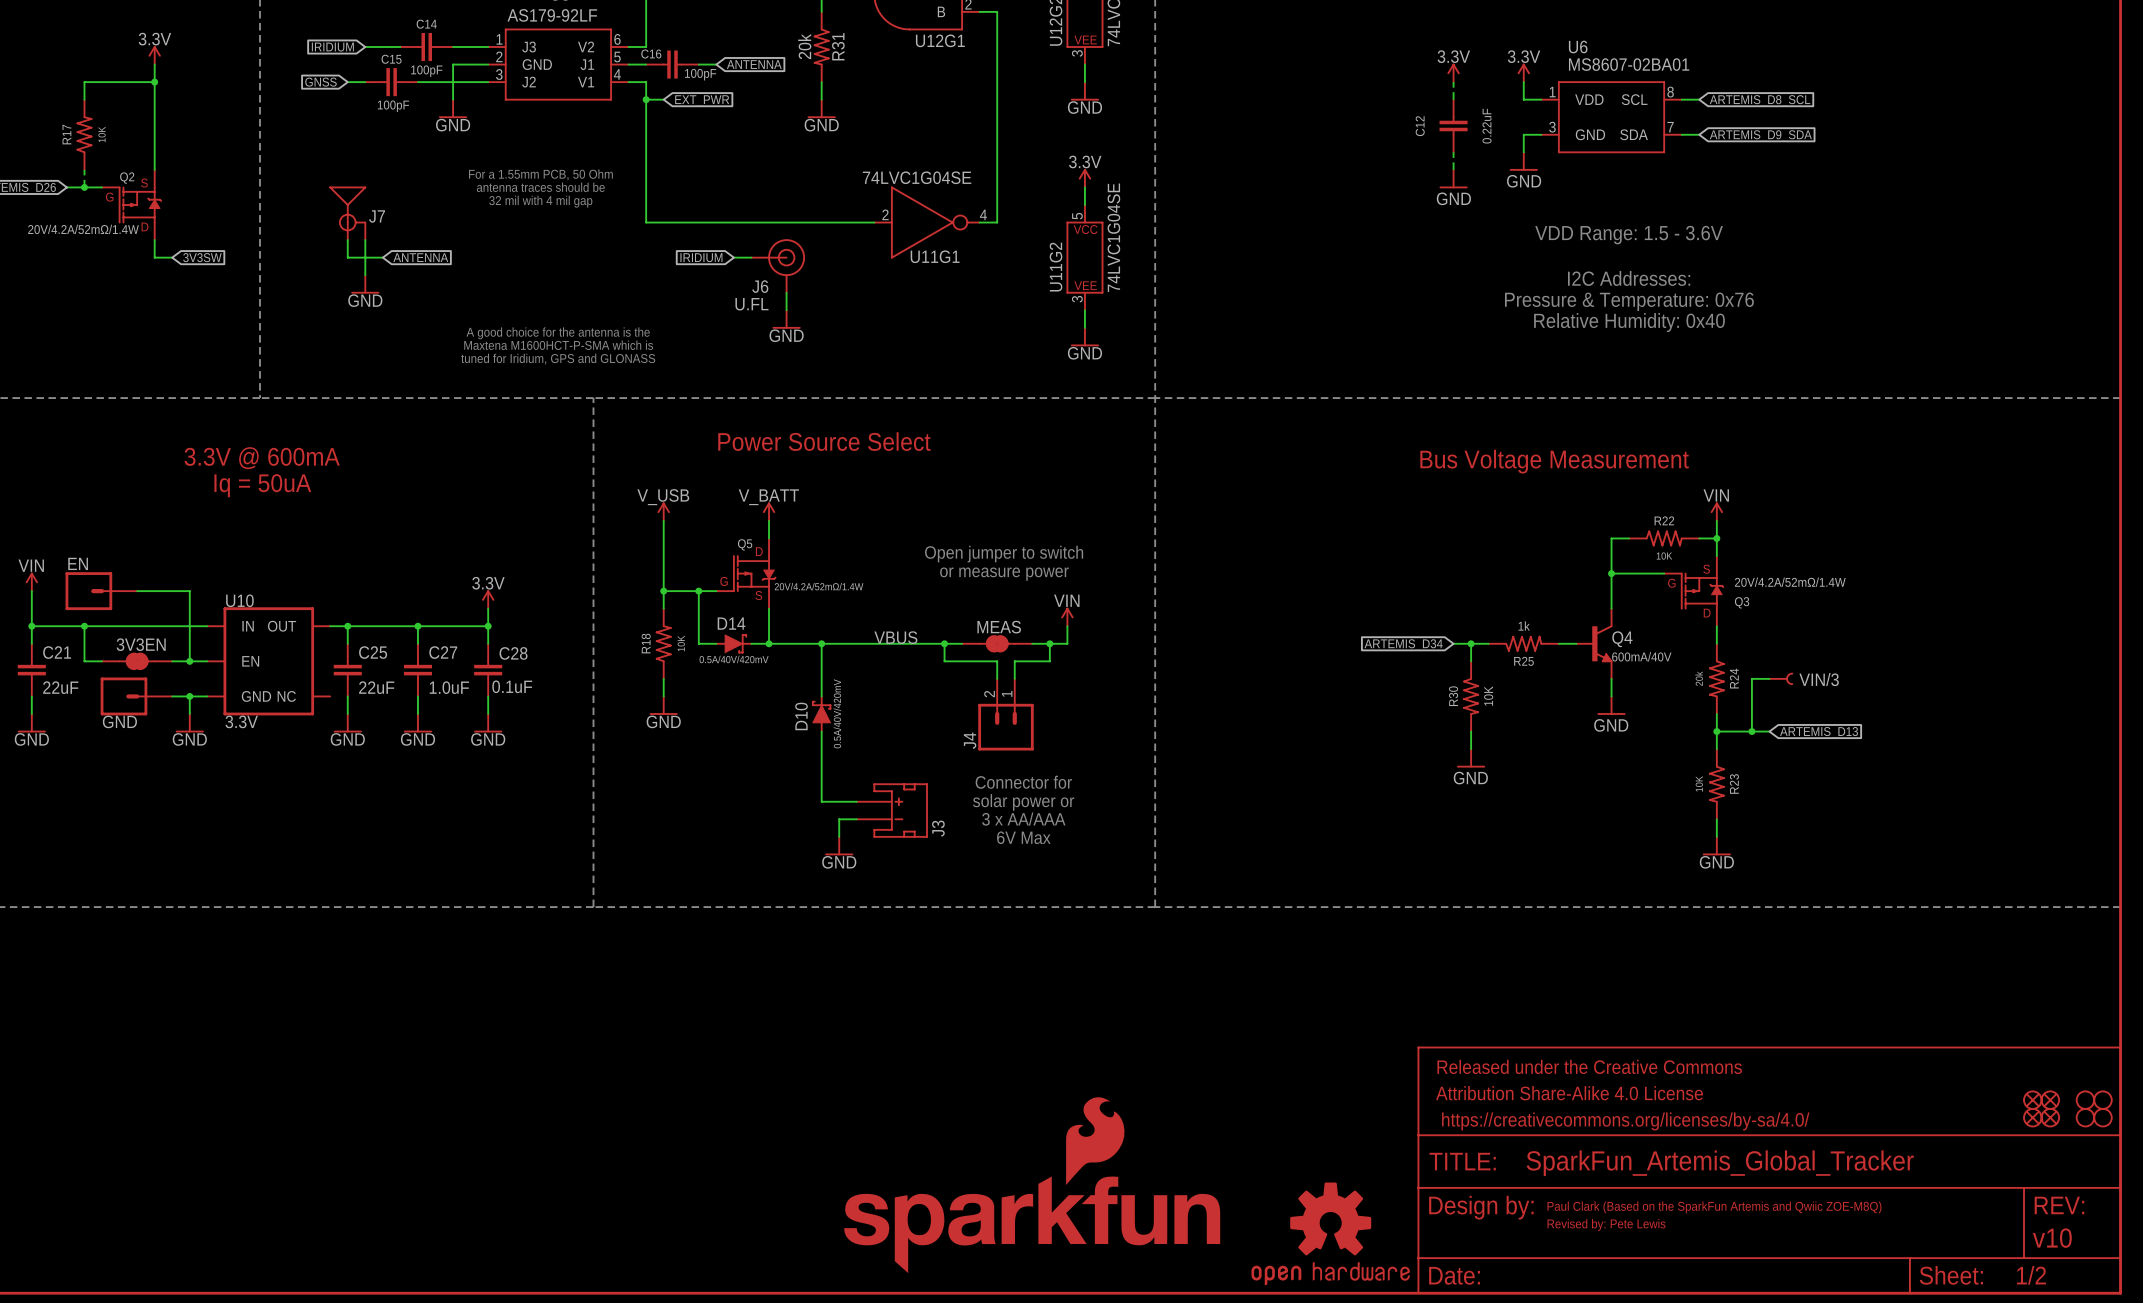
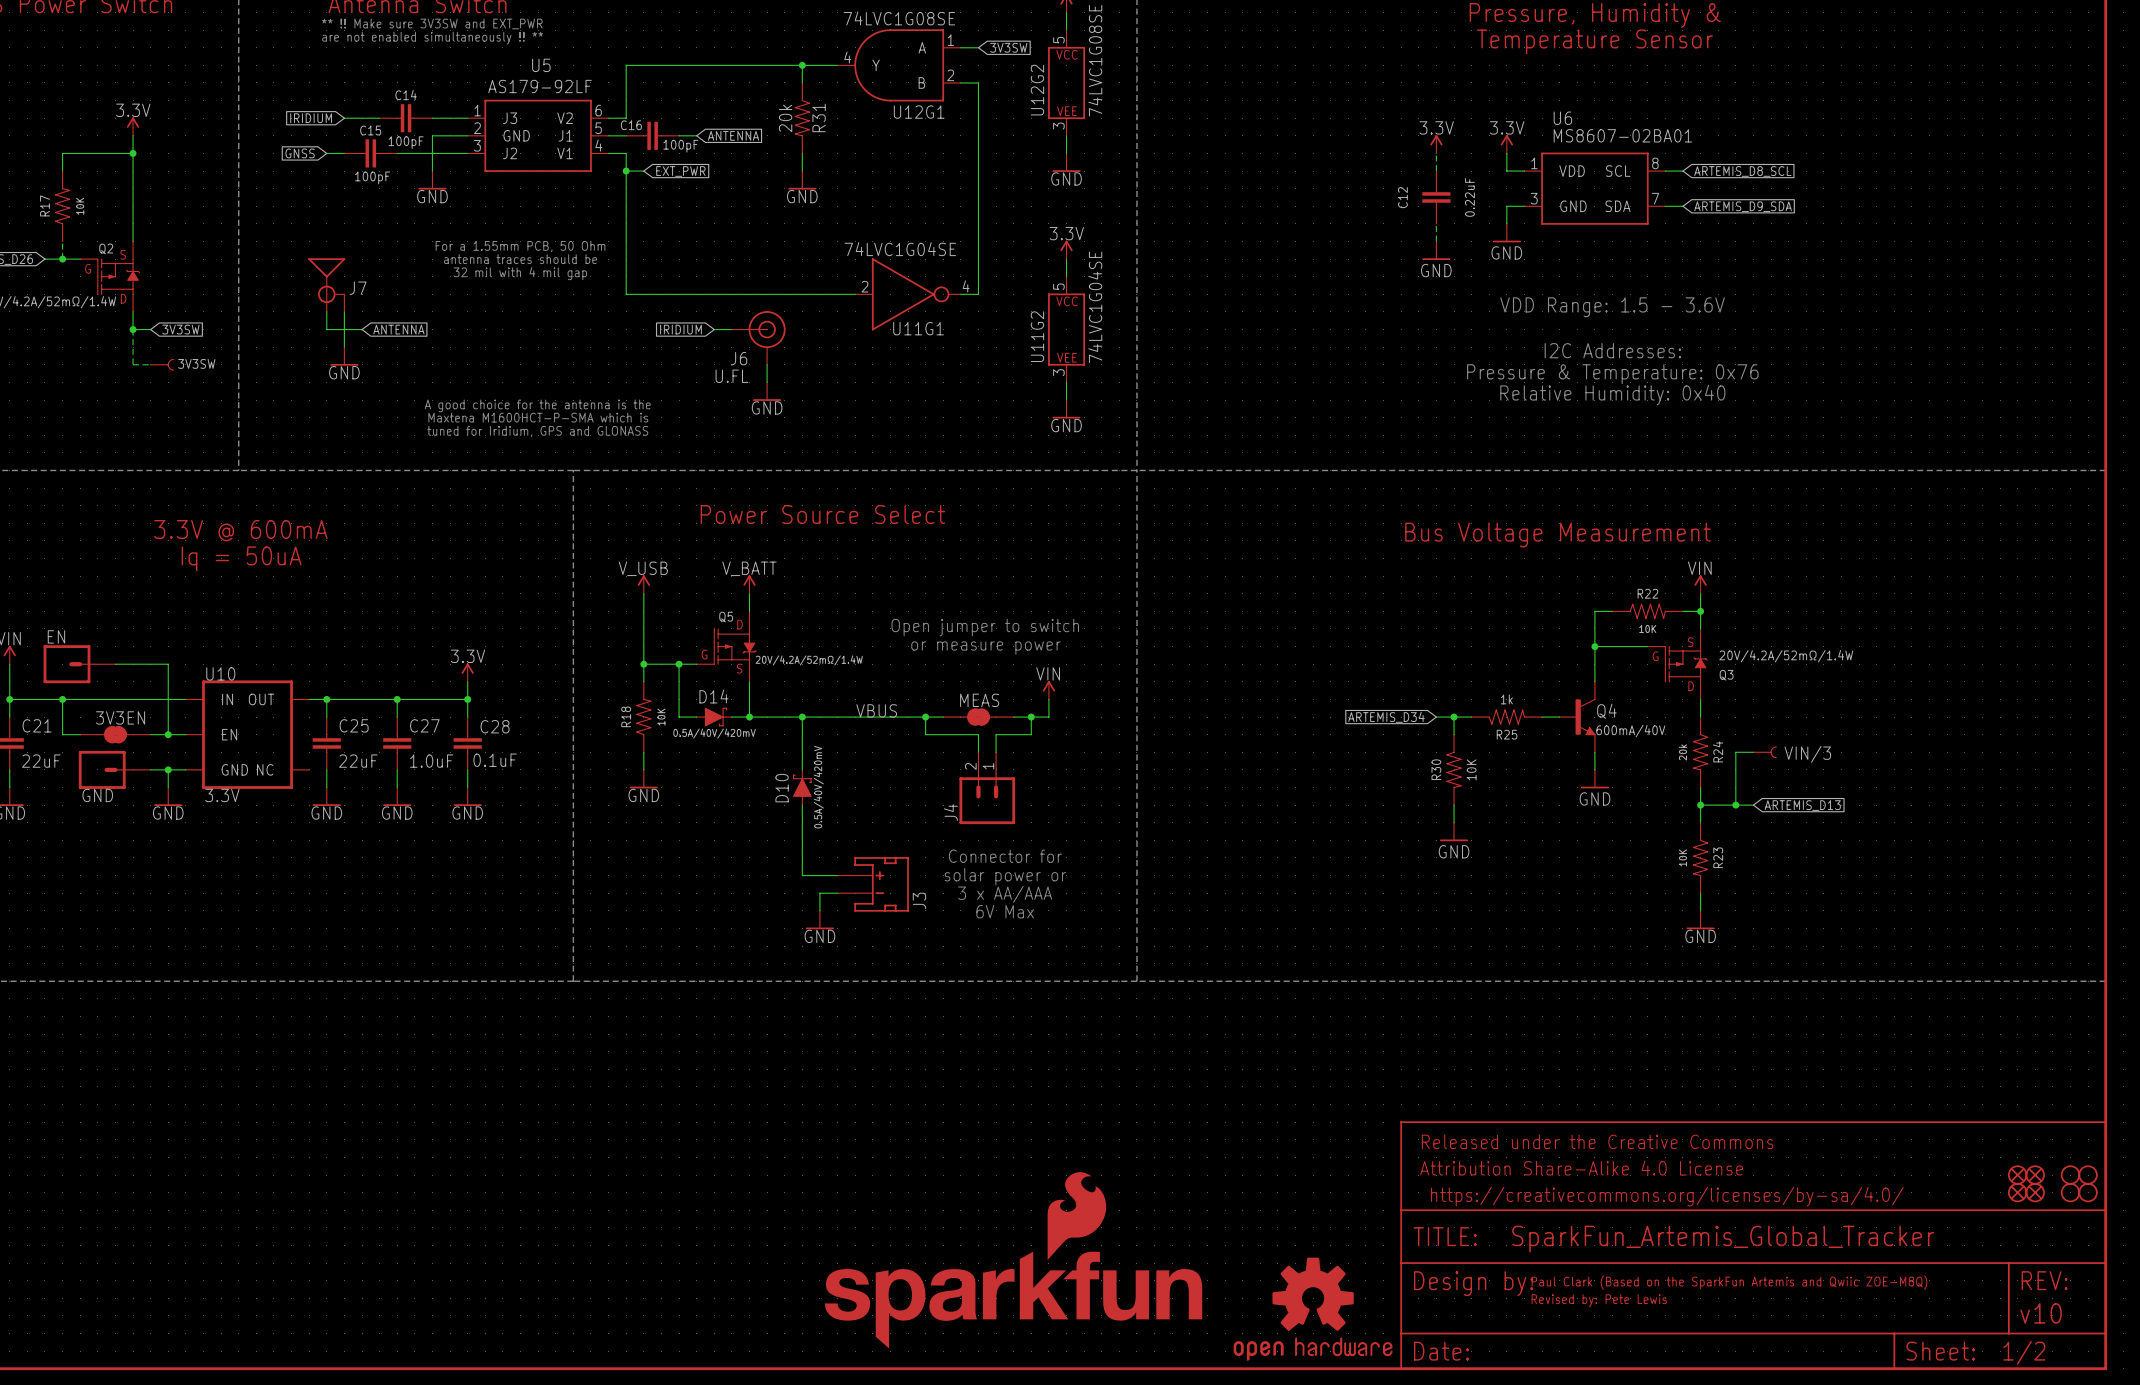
wire: none -> (133, 329) (133, 364) (150, 364)
junction: none -> (133, 329)
3V3SW: none -> (162, 364)

